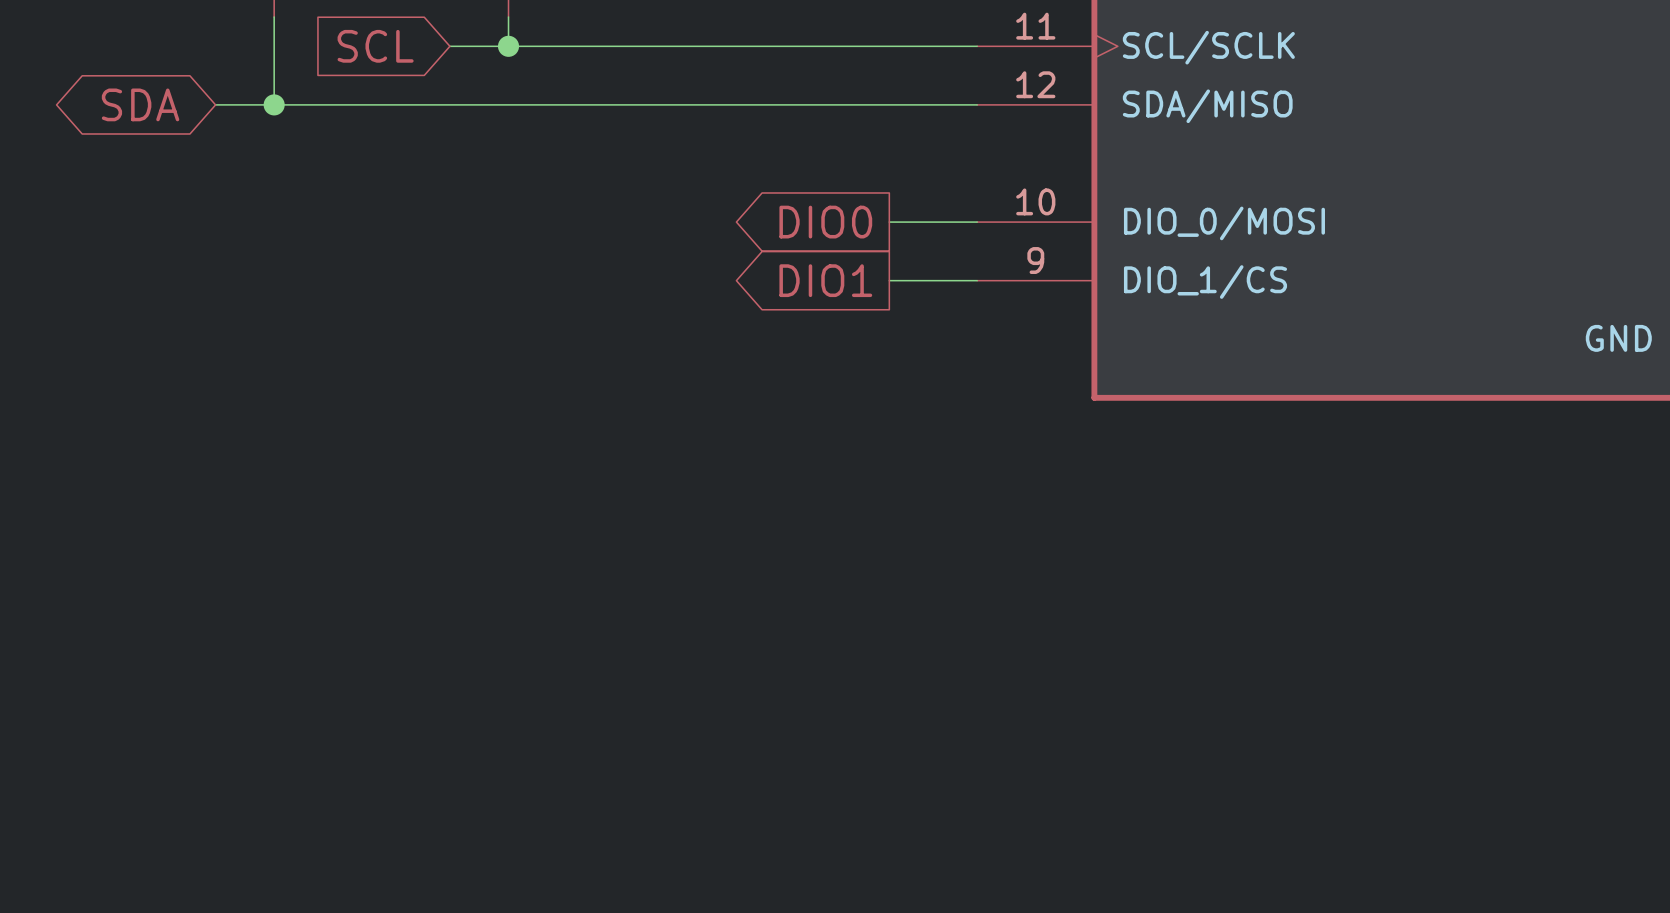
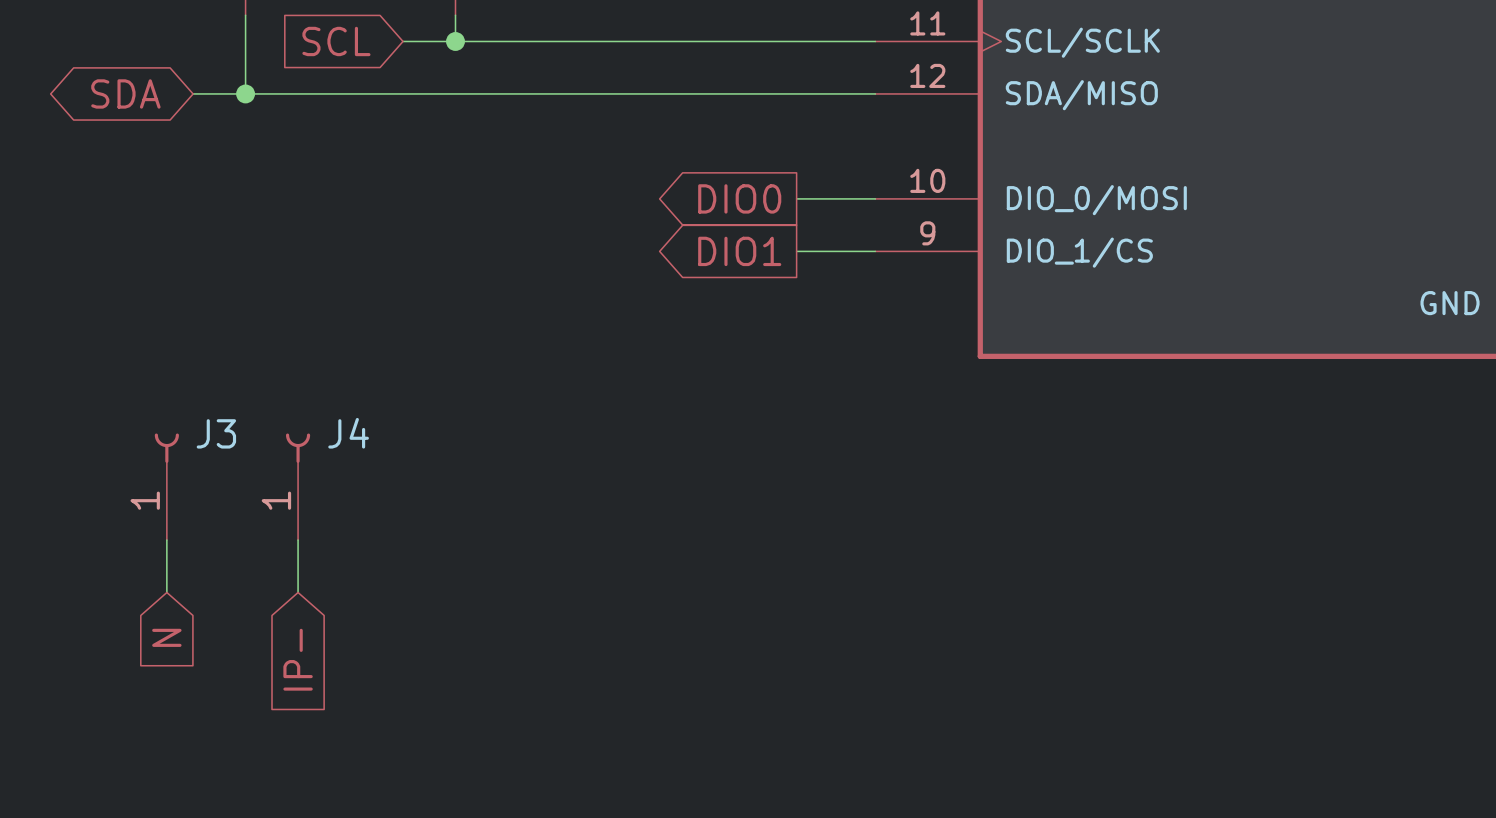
J3: none -> (166, 486)
J4: none -> (298, 486)
wire: none -> (166, 540) (166, 592)
wire: none -> (298, 540) (298, 592)
global label: none -> N (166, 637)
global label: none -> IP- (298, 659)

